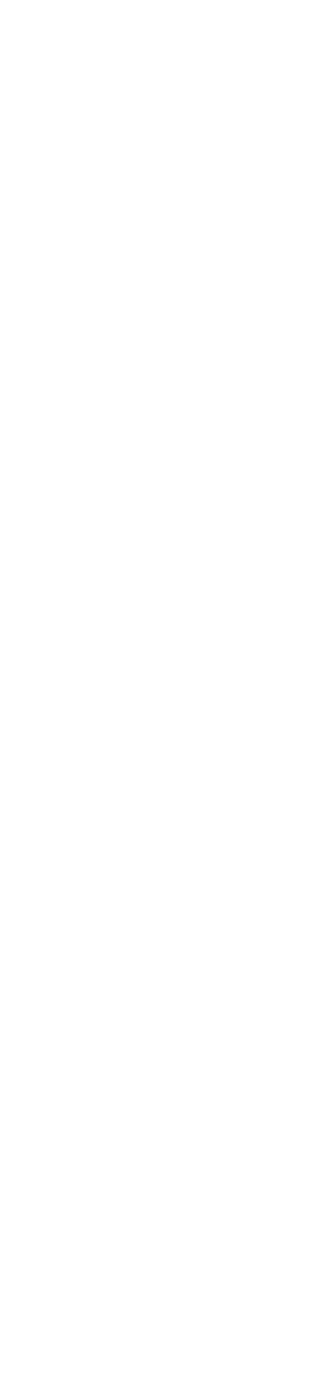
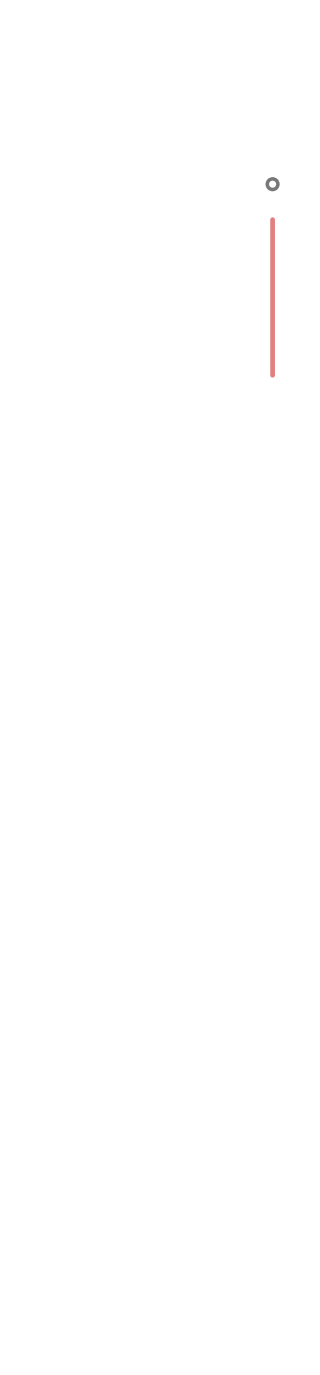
via: none -> (272, 184)
track: none -> (272, 219) (272, 375)

